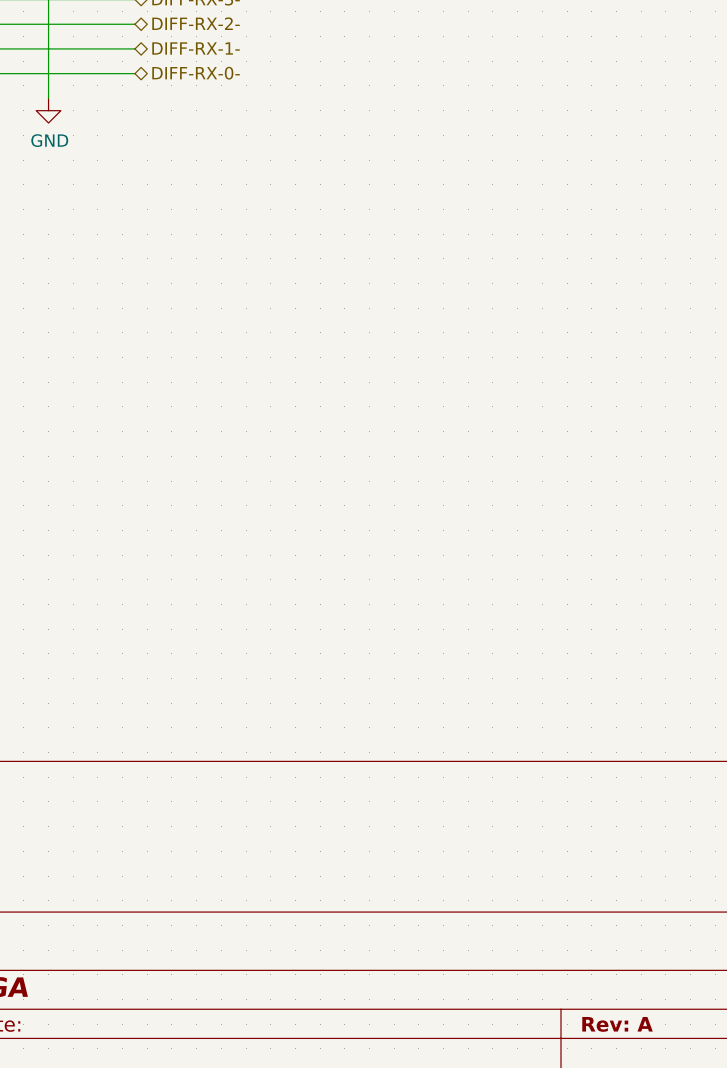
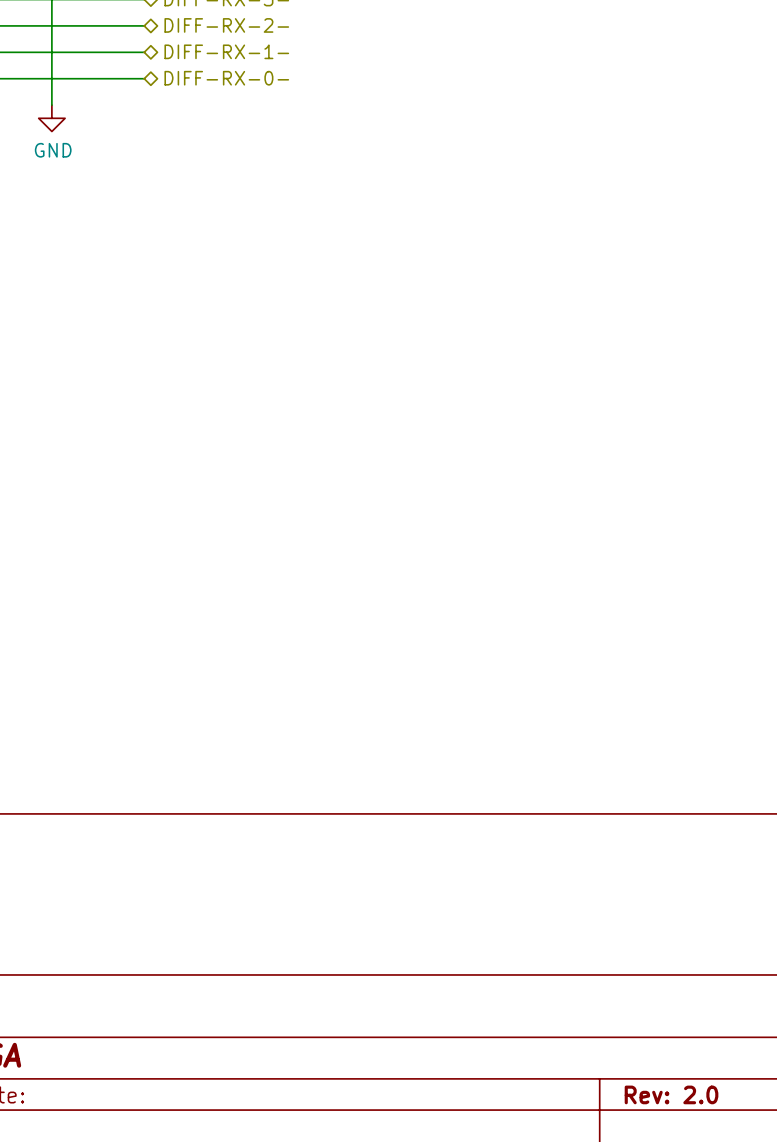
title block: Rev: A (617, 1024) -> Rev: 2.0 (671, 1094)

